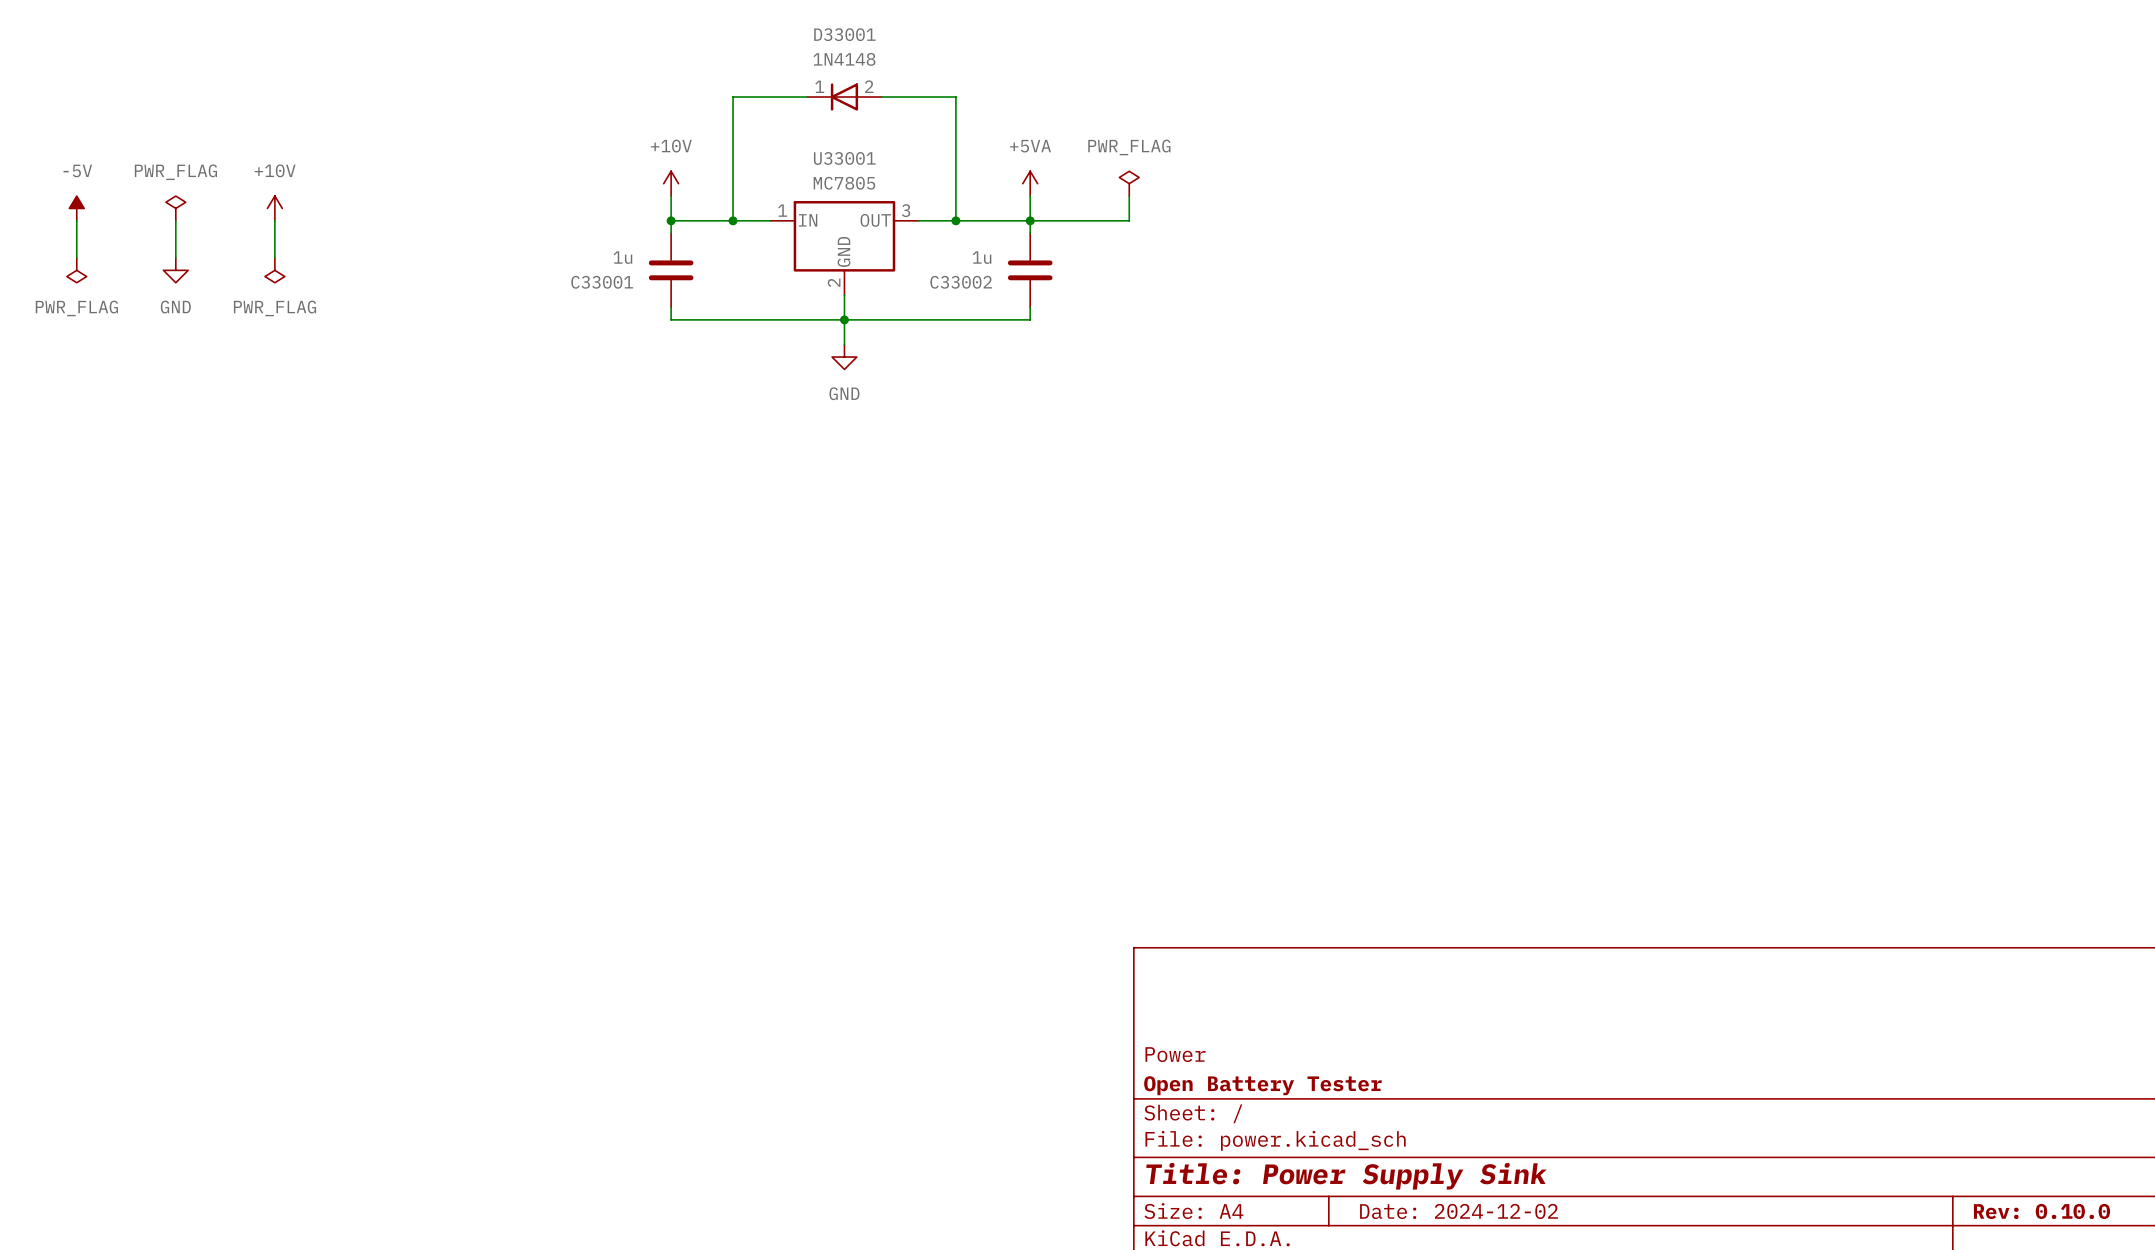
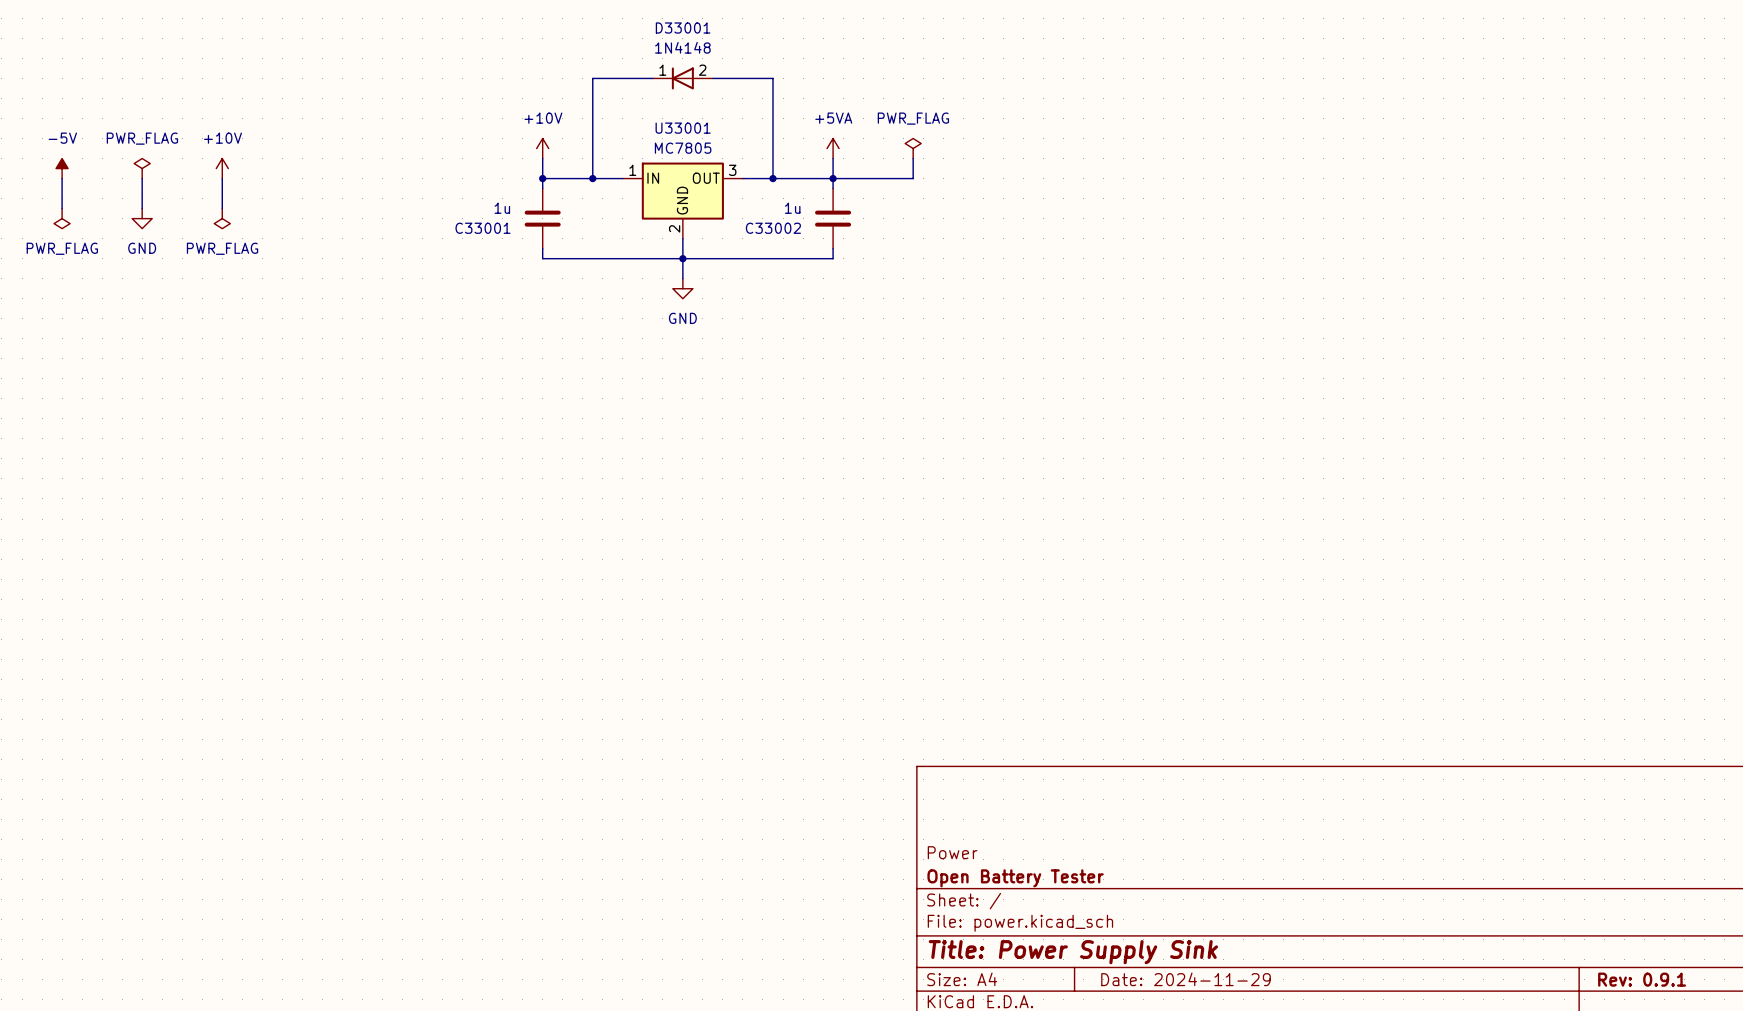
title block: Date: 2024-12-02 (1459, 1211) -> Date: 2024-11-29 (1186, 979)
title block: Rev: 0.10.0 (2041, 1211) -> Rev: 0.9.1 (1642, 979)

